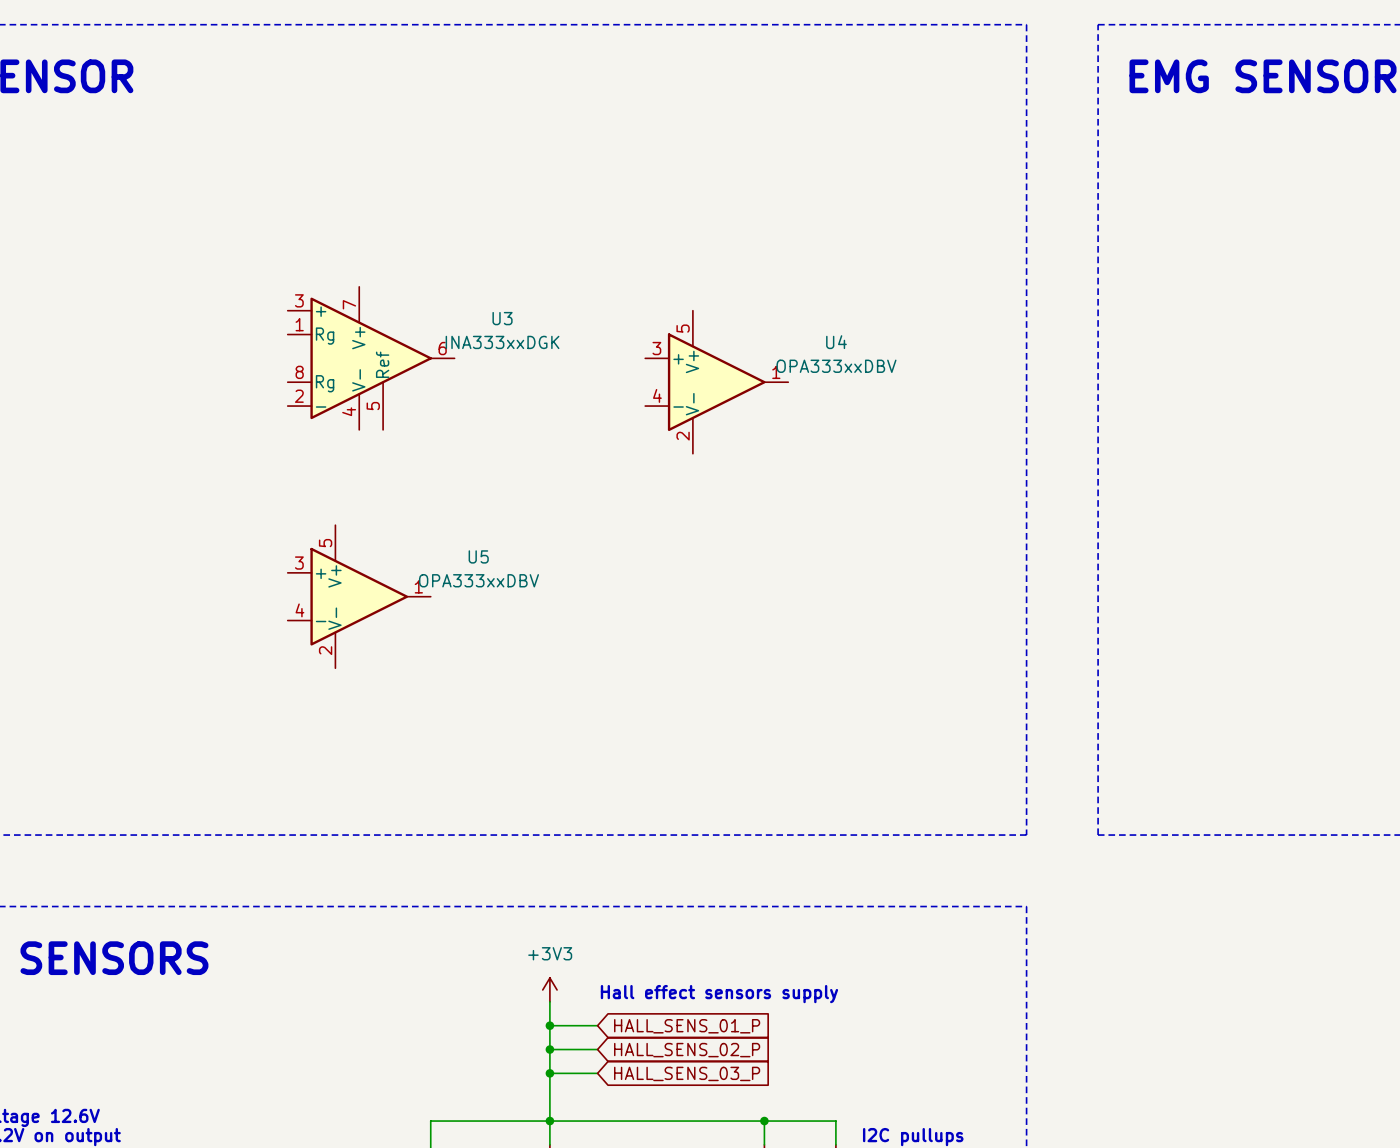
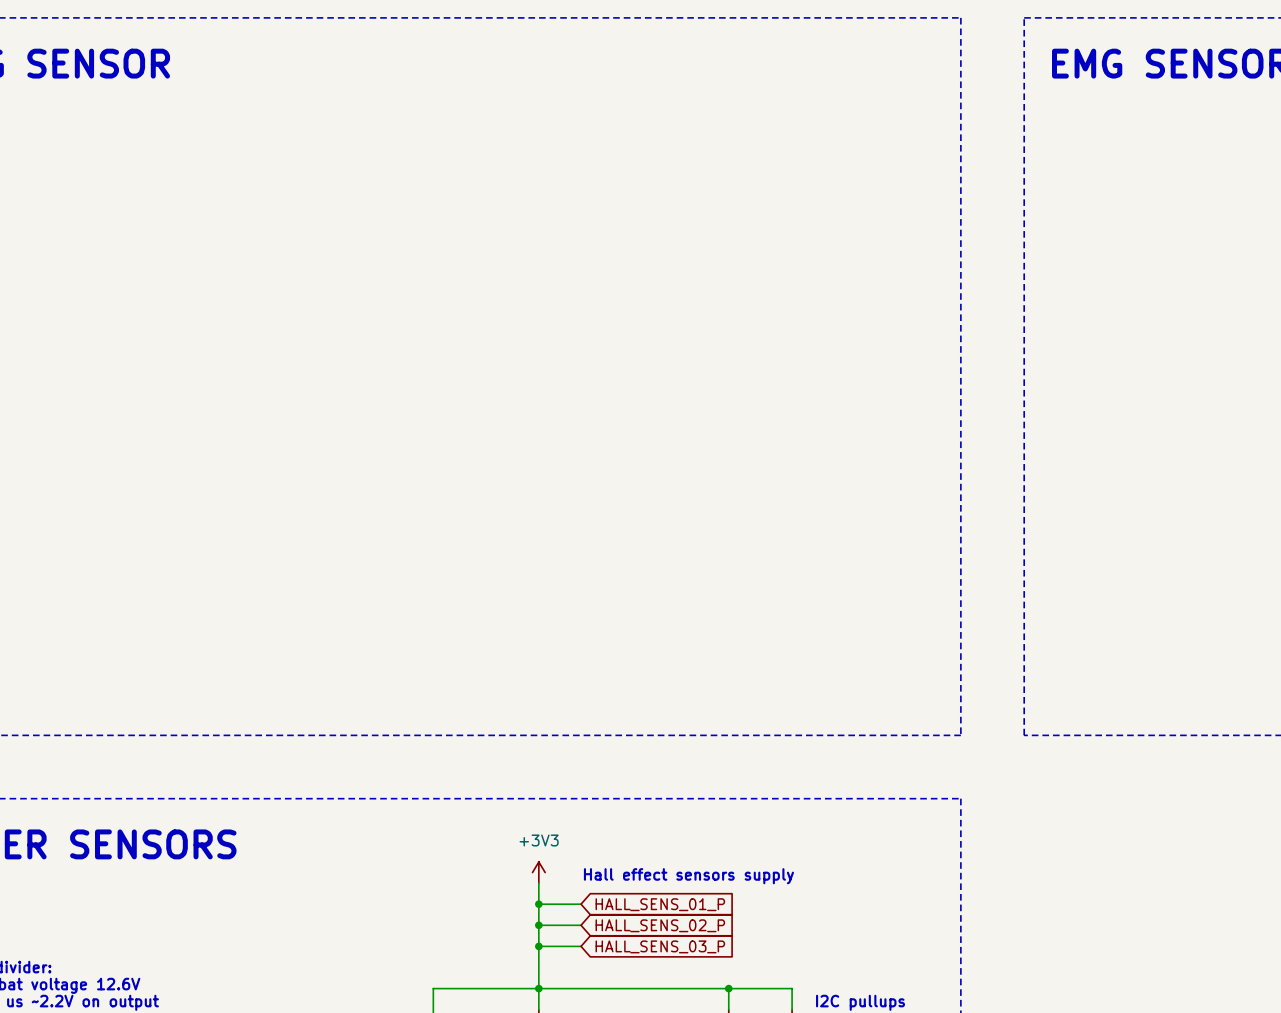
U3: INA333xxDGK (371, 358) -> none
U4: OPA333xxDBV (716, 382) -> none
U5: OPA333xxDBV (359, 596) -> none

